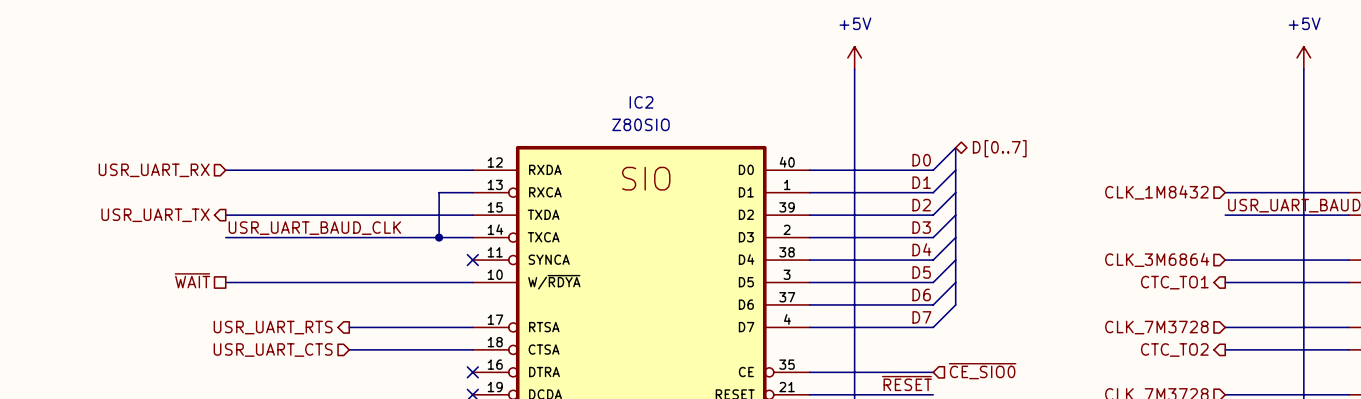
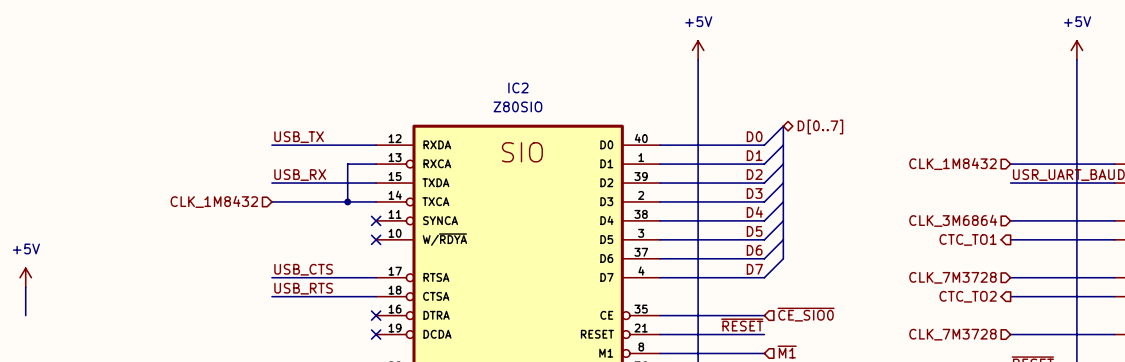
label: none -> USB_TX (299, 137)
hierarchical label: USR_UART_RX (154, 170) -> none
wire: (225, 170) (349, 170) -> none
label: none -> USB_RX (300, 175)
hierarchical label: USR_UART_TX (155, 215) -> none
wire: (225, 215) (349, 215) -> none
label: USR_UART_BAUD_CLK (314, 228) -> none
wire: (225, 237) (349, 237) -> none
hierarchical label: none -> CLK_1M8432 (214, 201)
hierarchical label: ~{WAIT} (192, 280) -> none
wire: (225, 282) (472, 282) -> none
no-connect mark: none -> (376, 239)
label: none -> USB_CTS (303, 269)
power symbol: none -> +5V (25, 277)
hierarchical label: USR_UART_RTS (273, 327) -> none
wire: none -> (25, 287) (25, 315)
label: none -> USB_RTS (303, 288)
hierarchical label: USR_UART_CTS (273, 350) -> none

